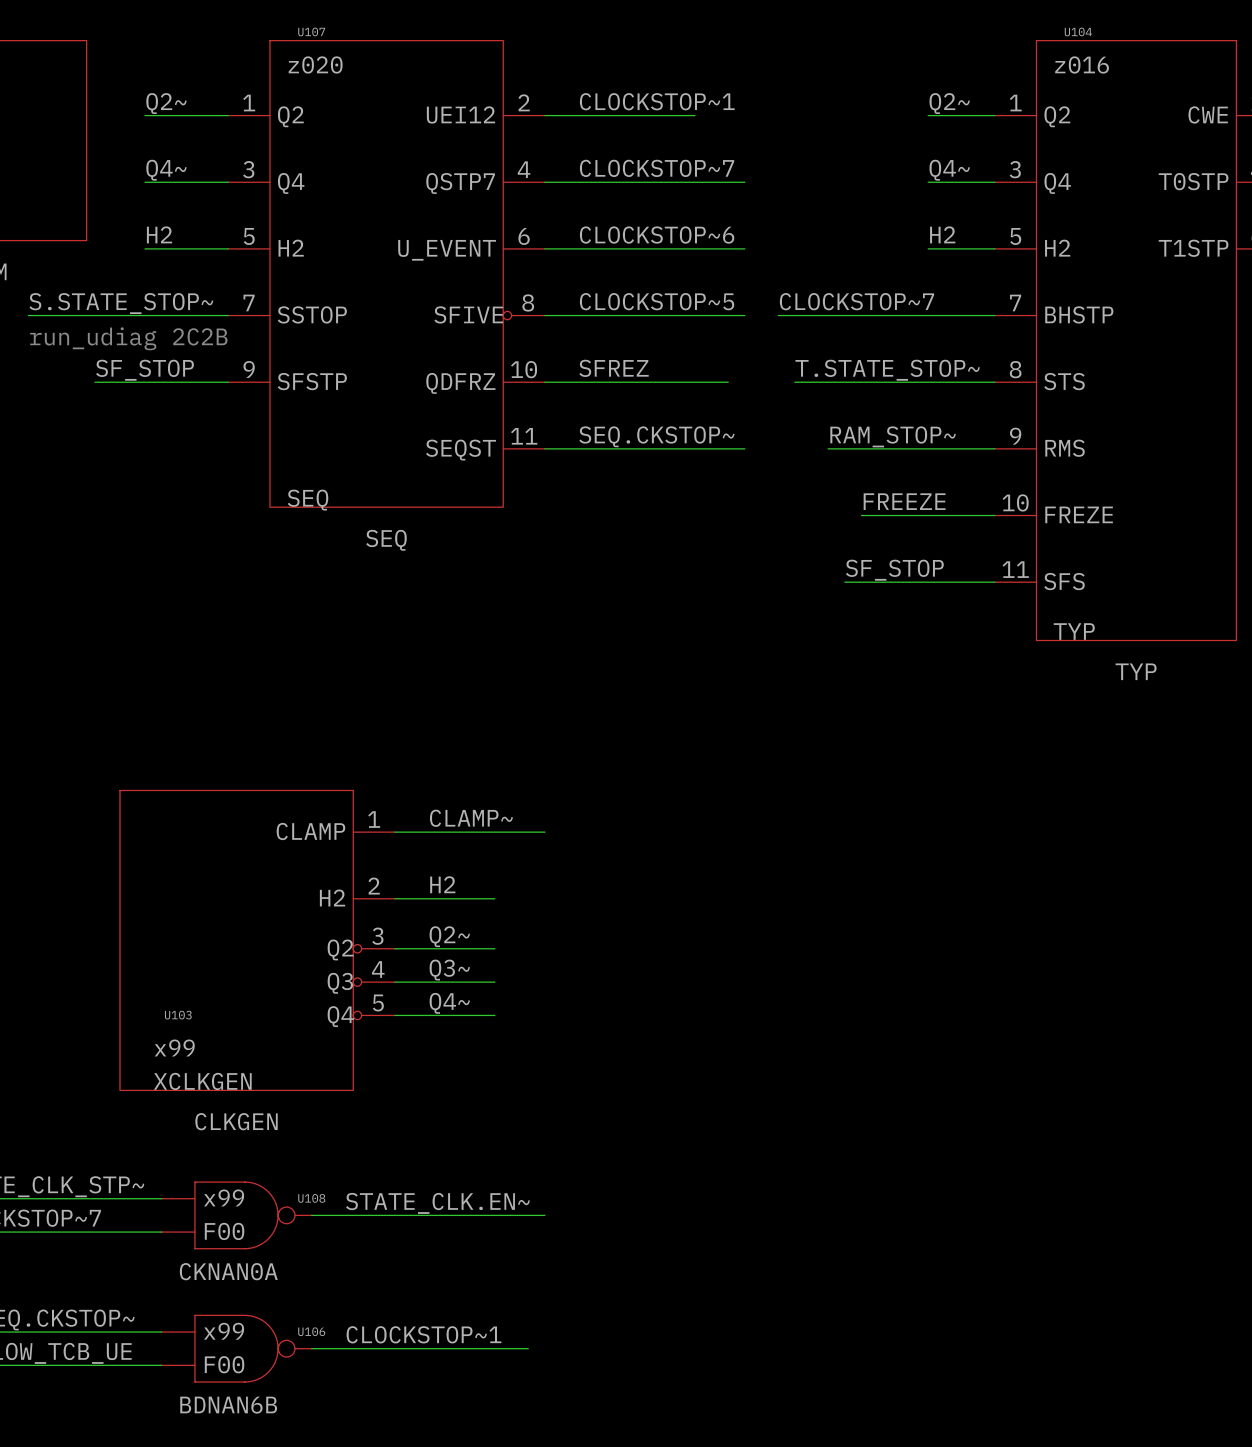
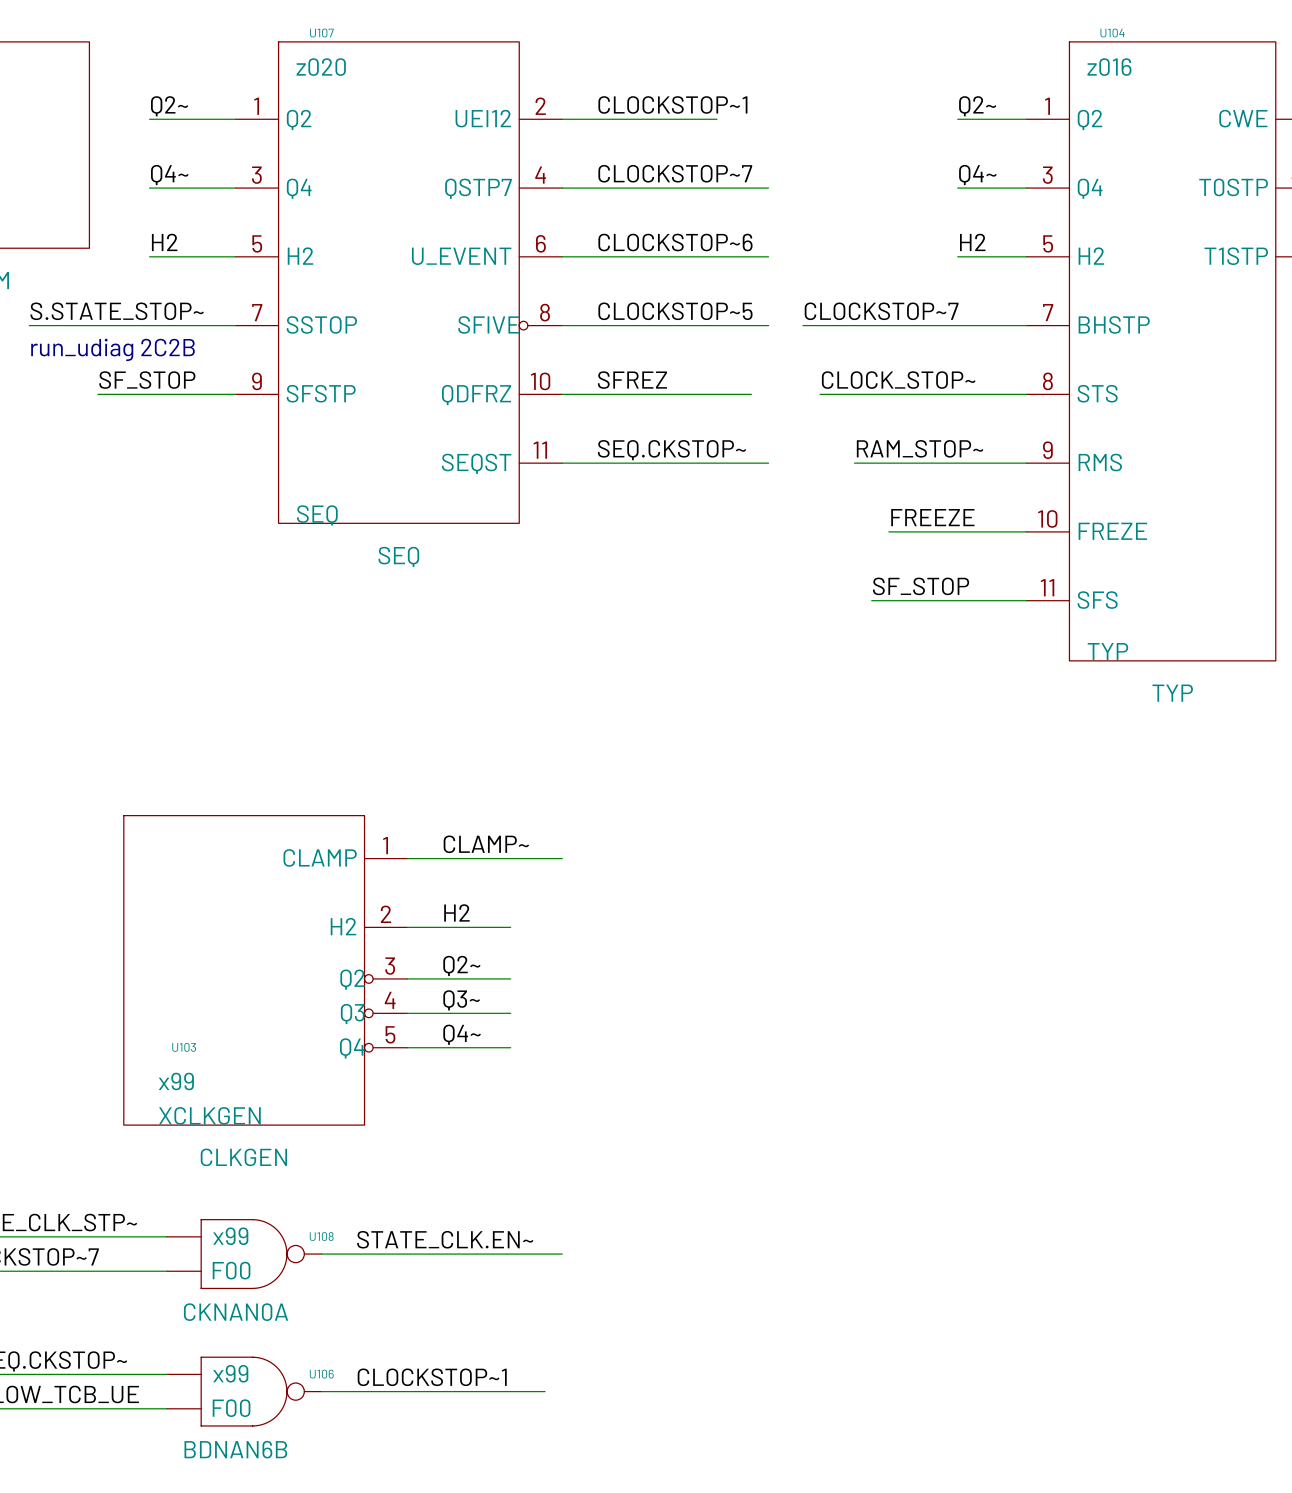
label: T.STATE_STOP~ (887, 370) -> CLOCK_STOP~ (898, 380)

